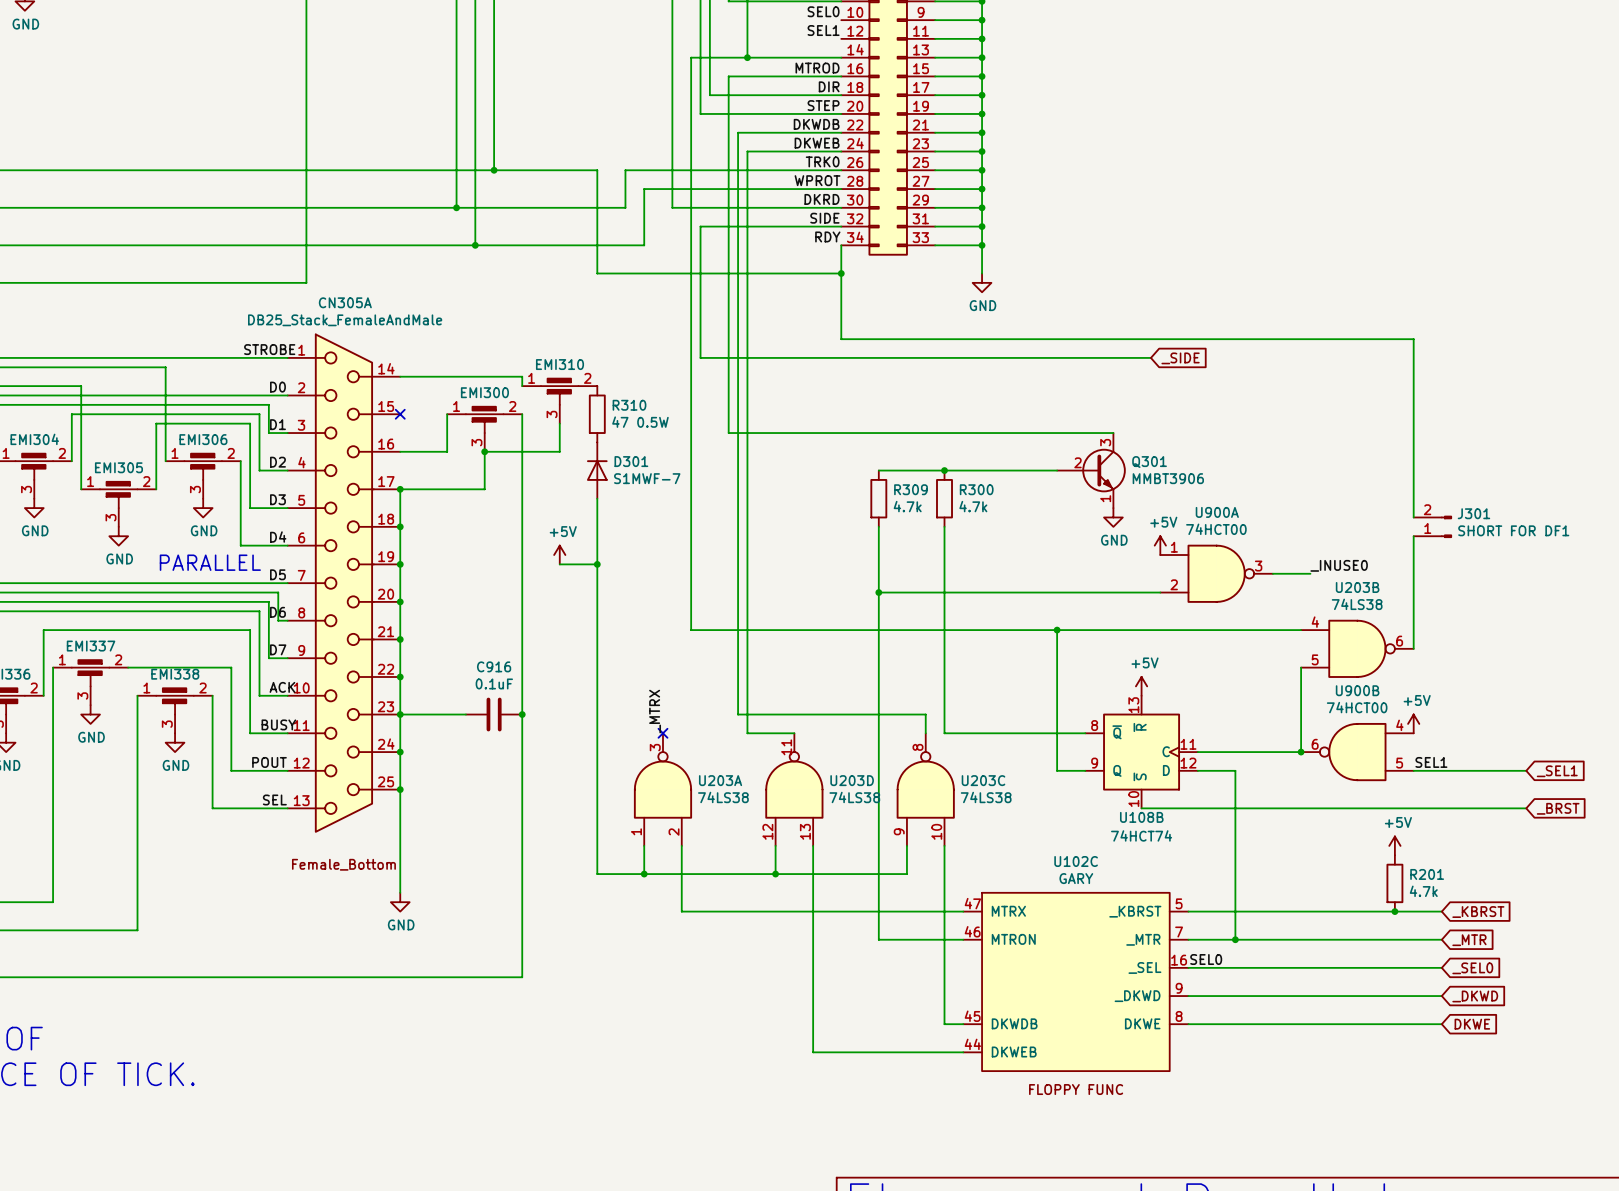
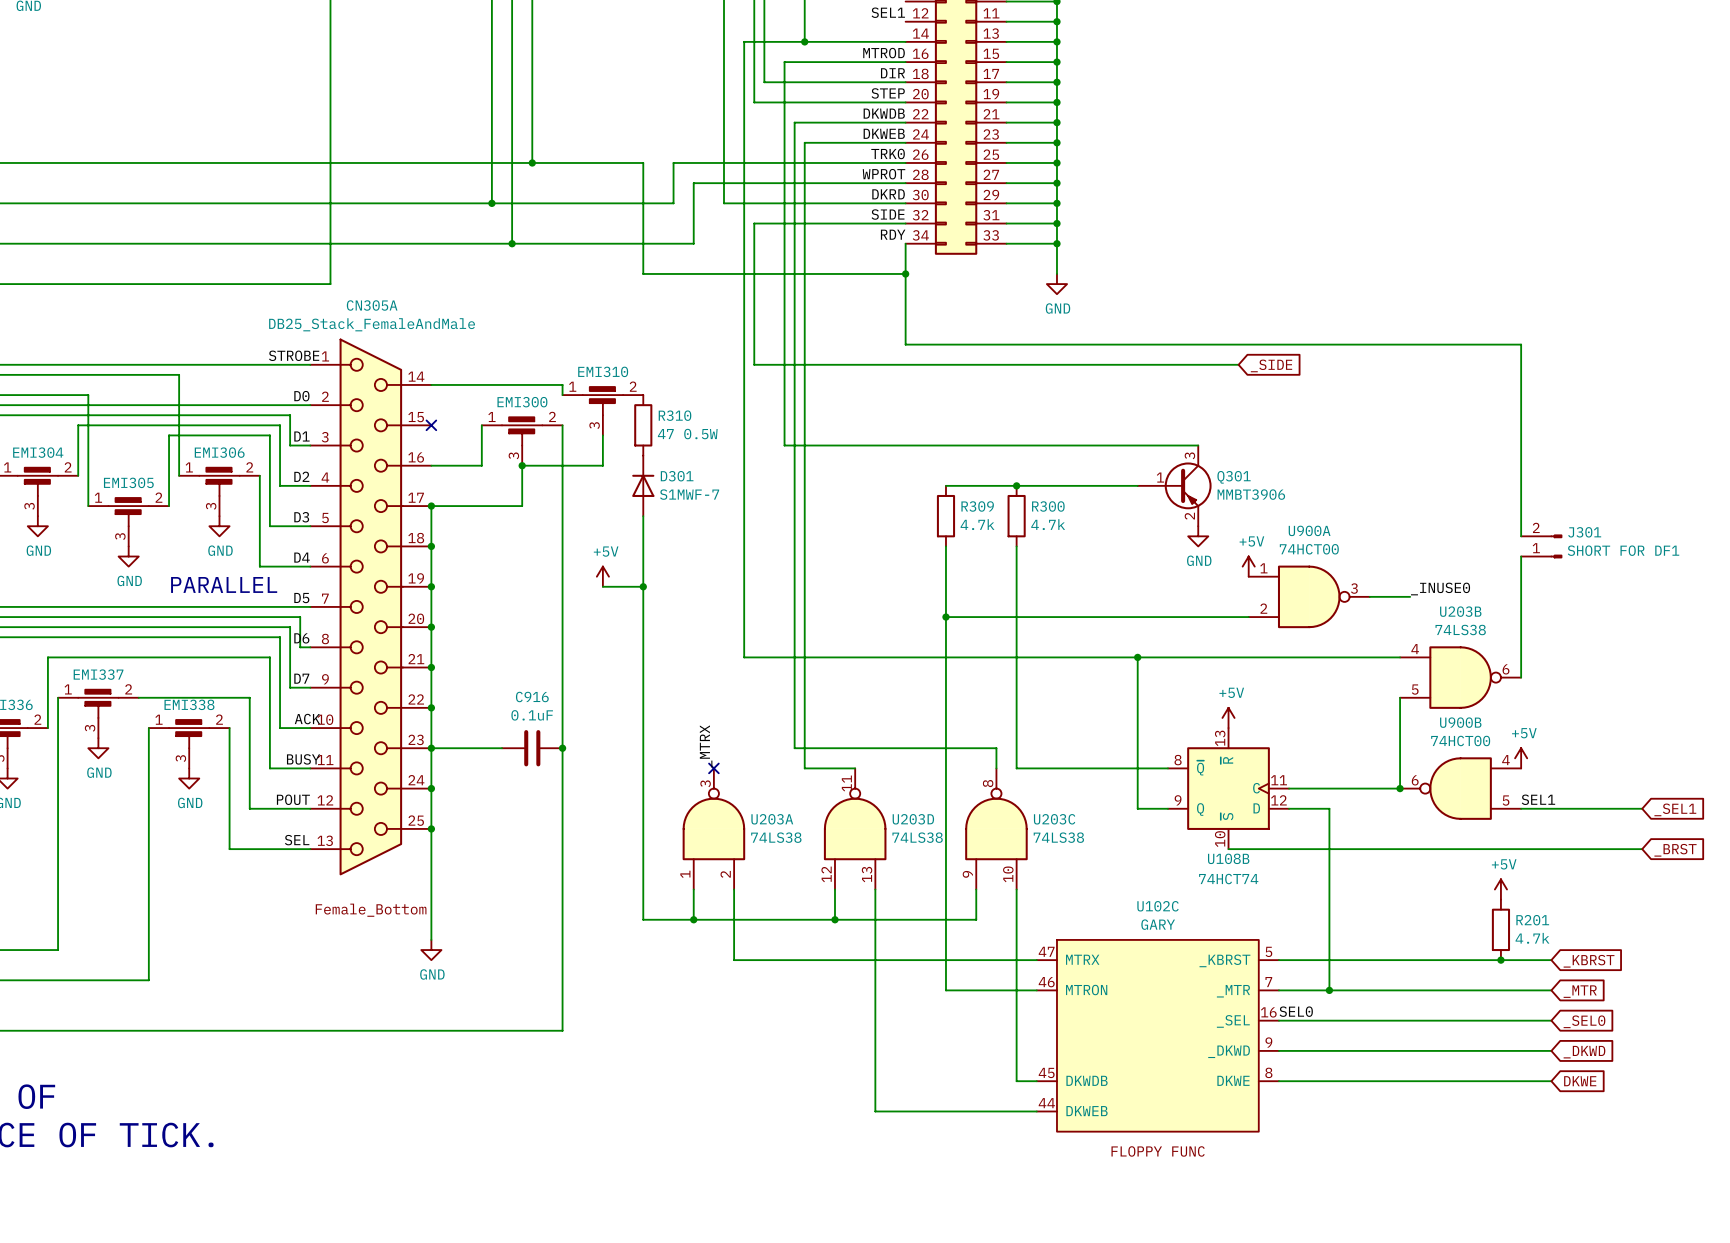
Q301 symbol: [1057, 433, 1126, 509] -> [1137, 445, 1212, 527]

